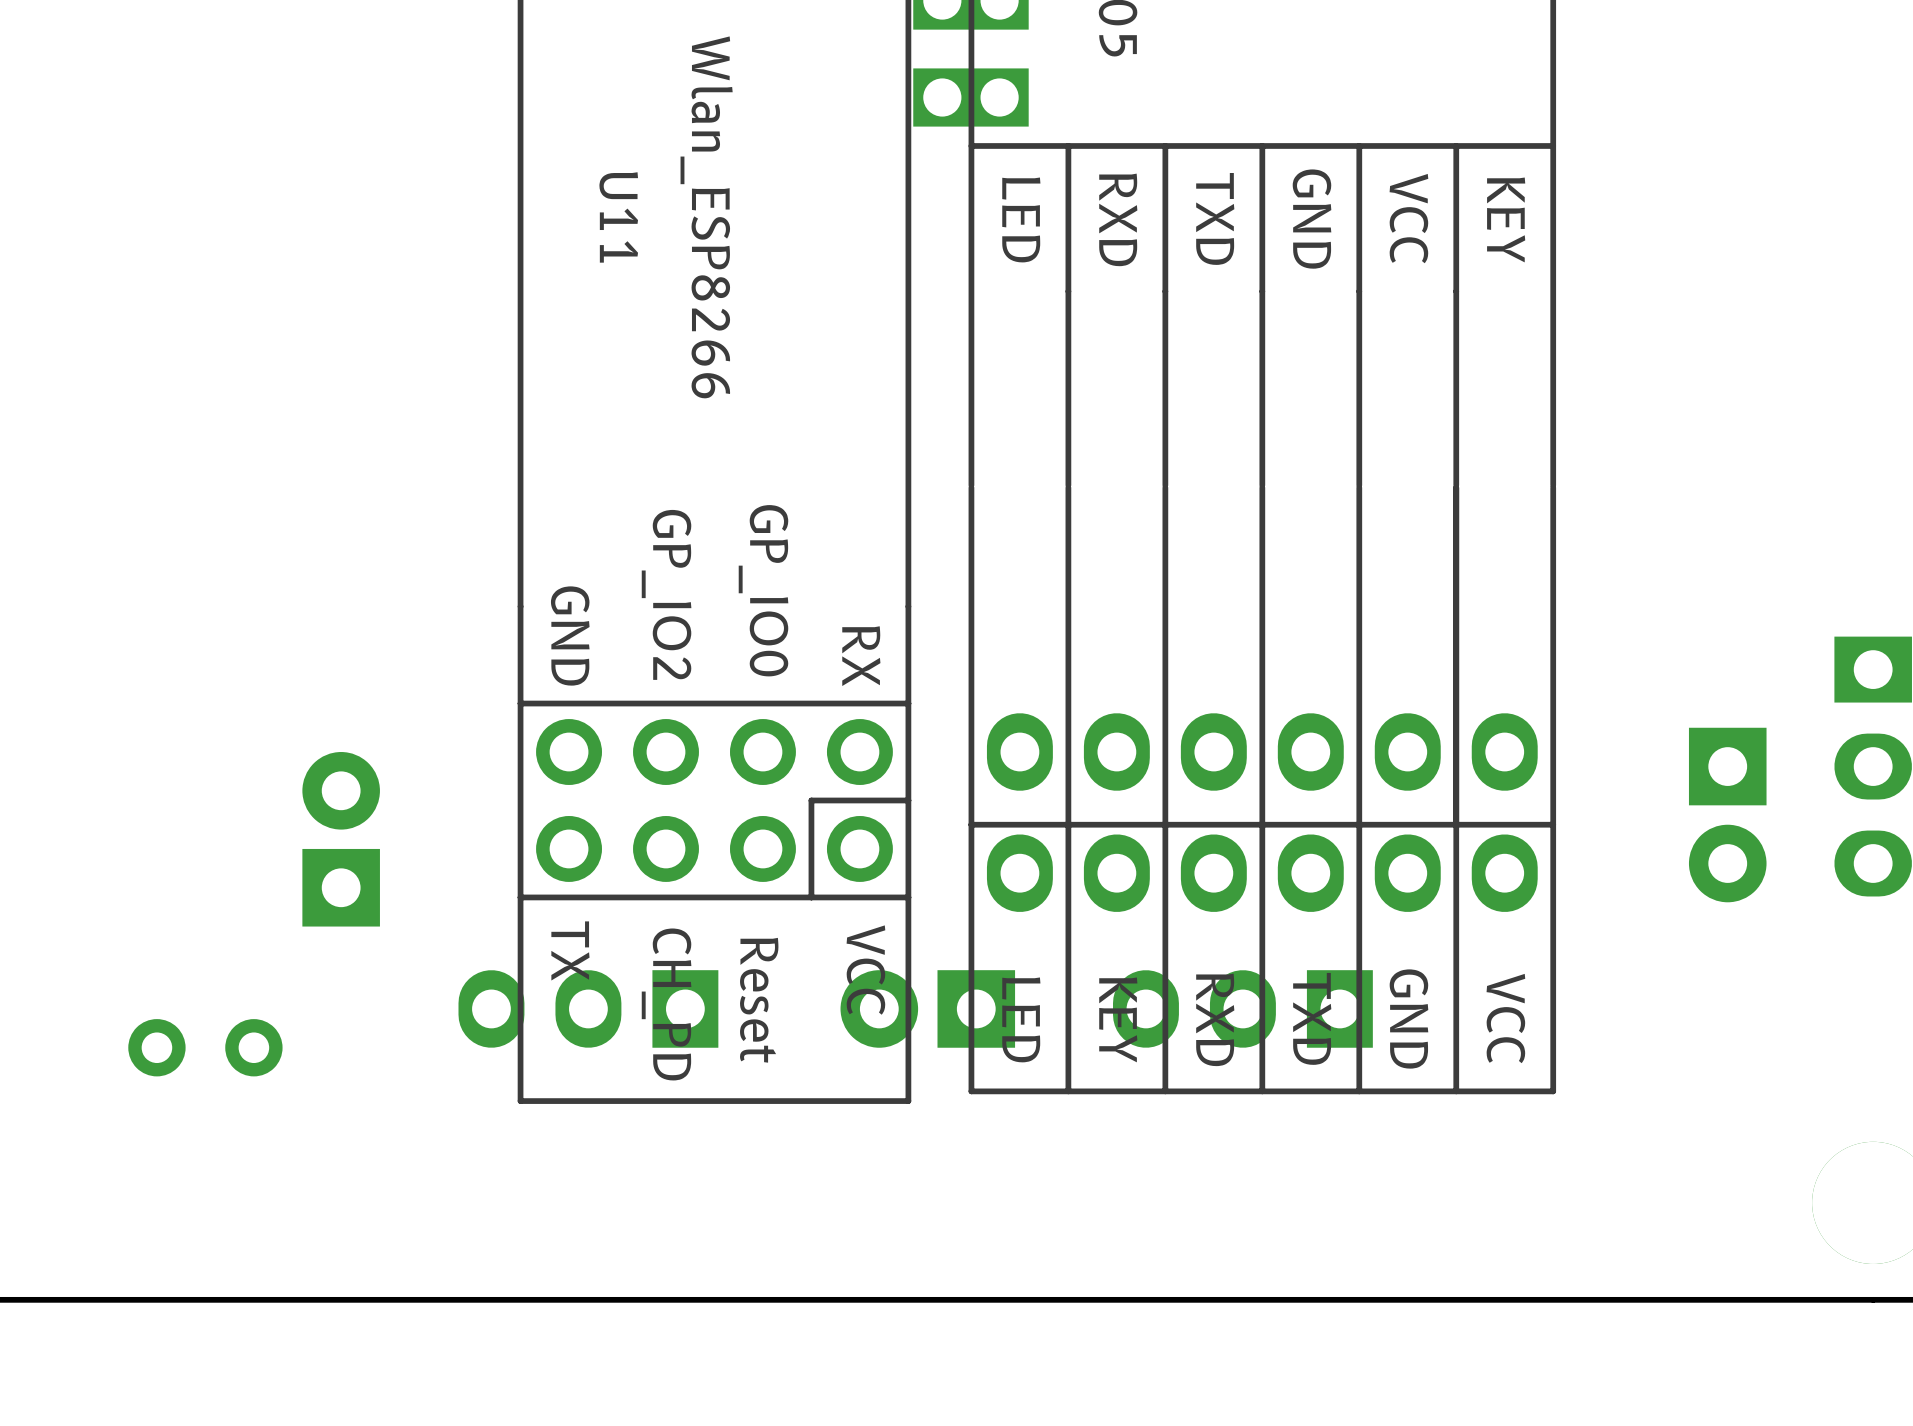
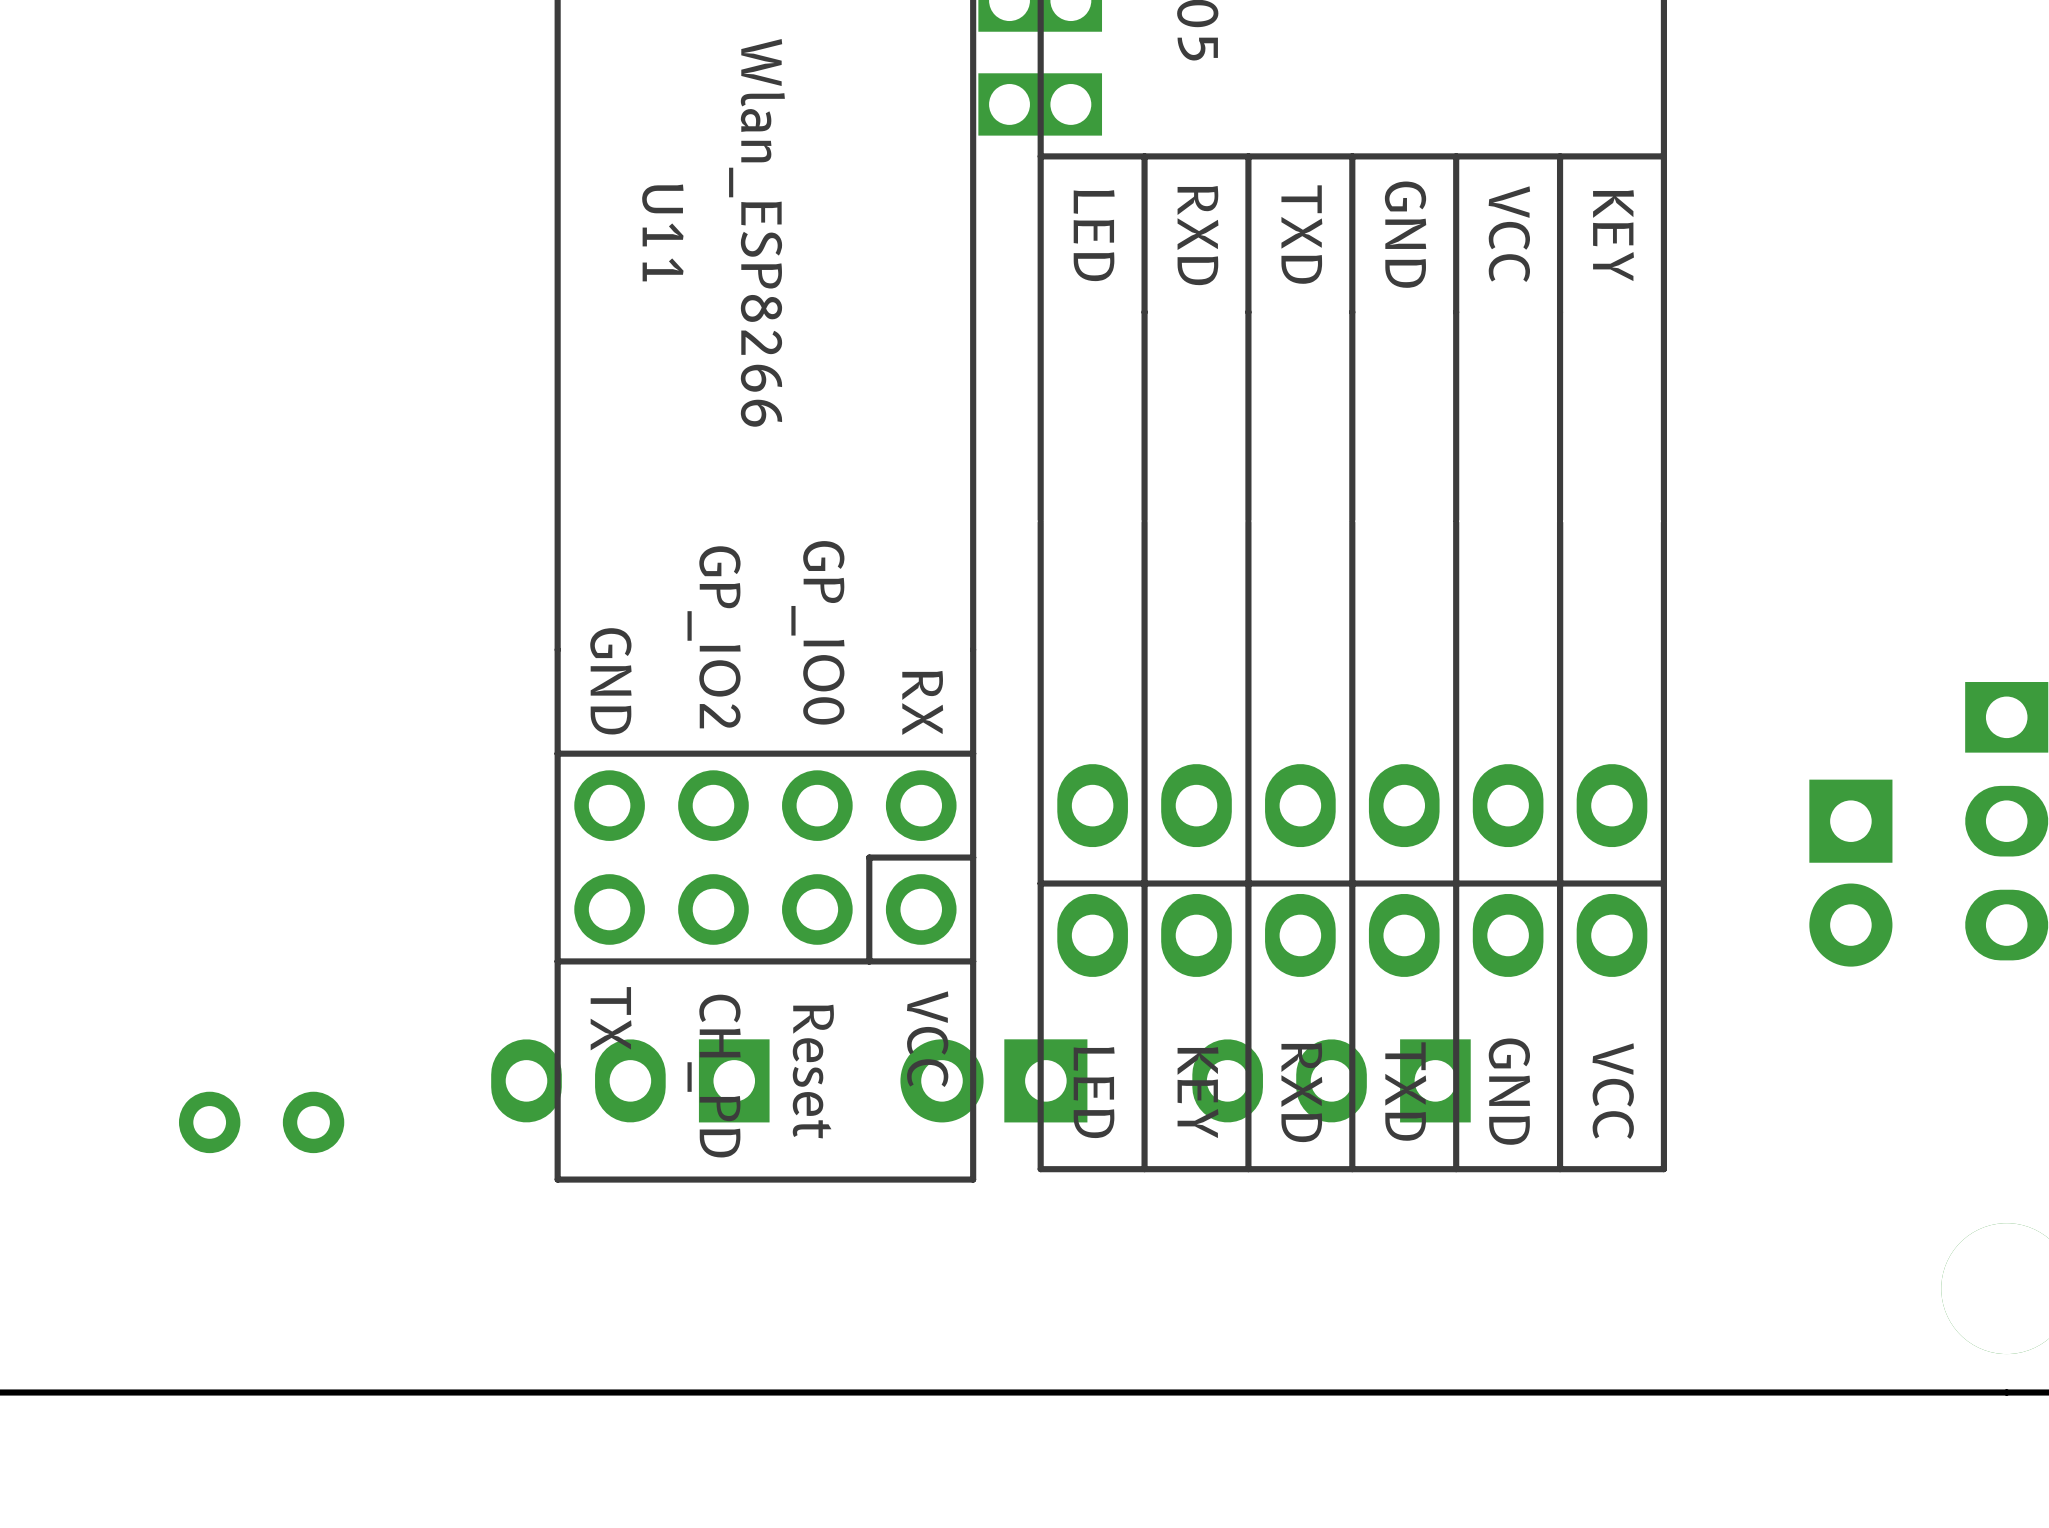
part: (341, 839) -> none
part position: (205, 1047) -> (261, 1122)

